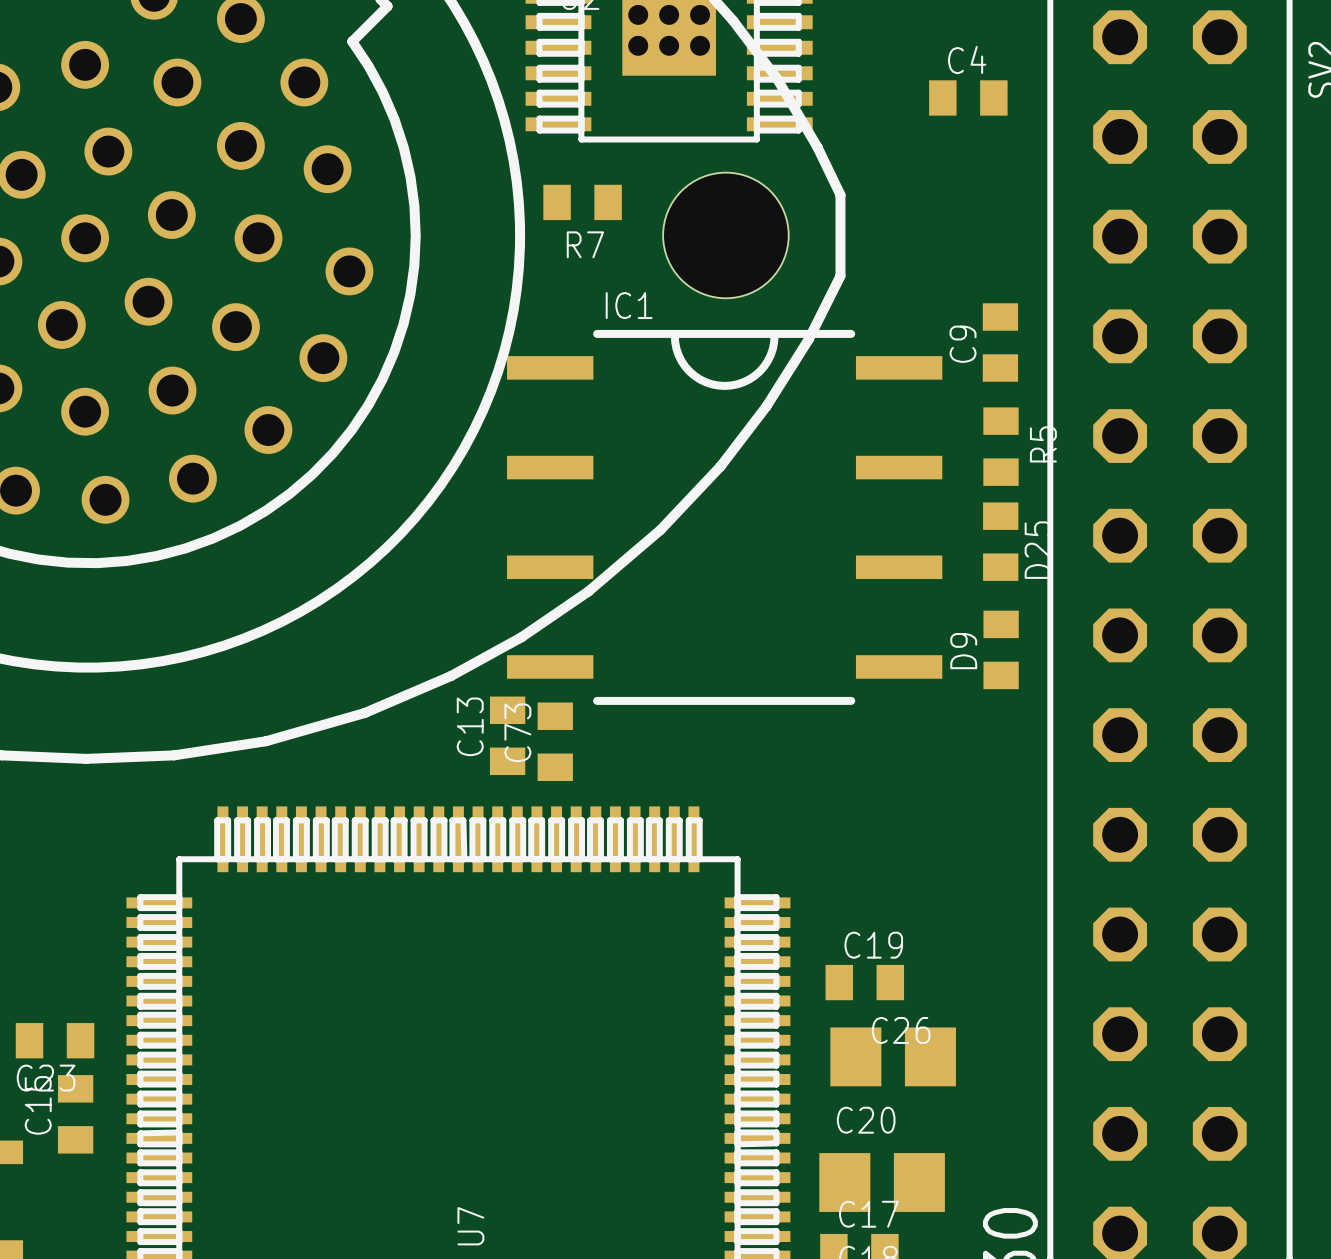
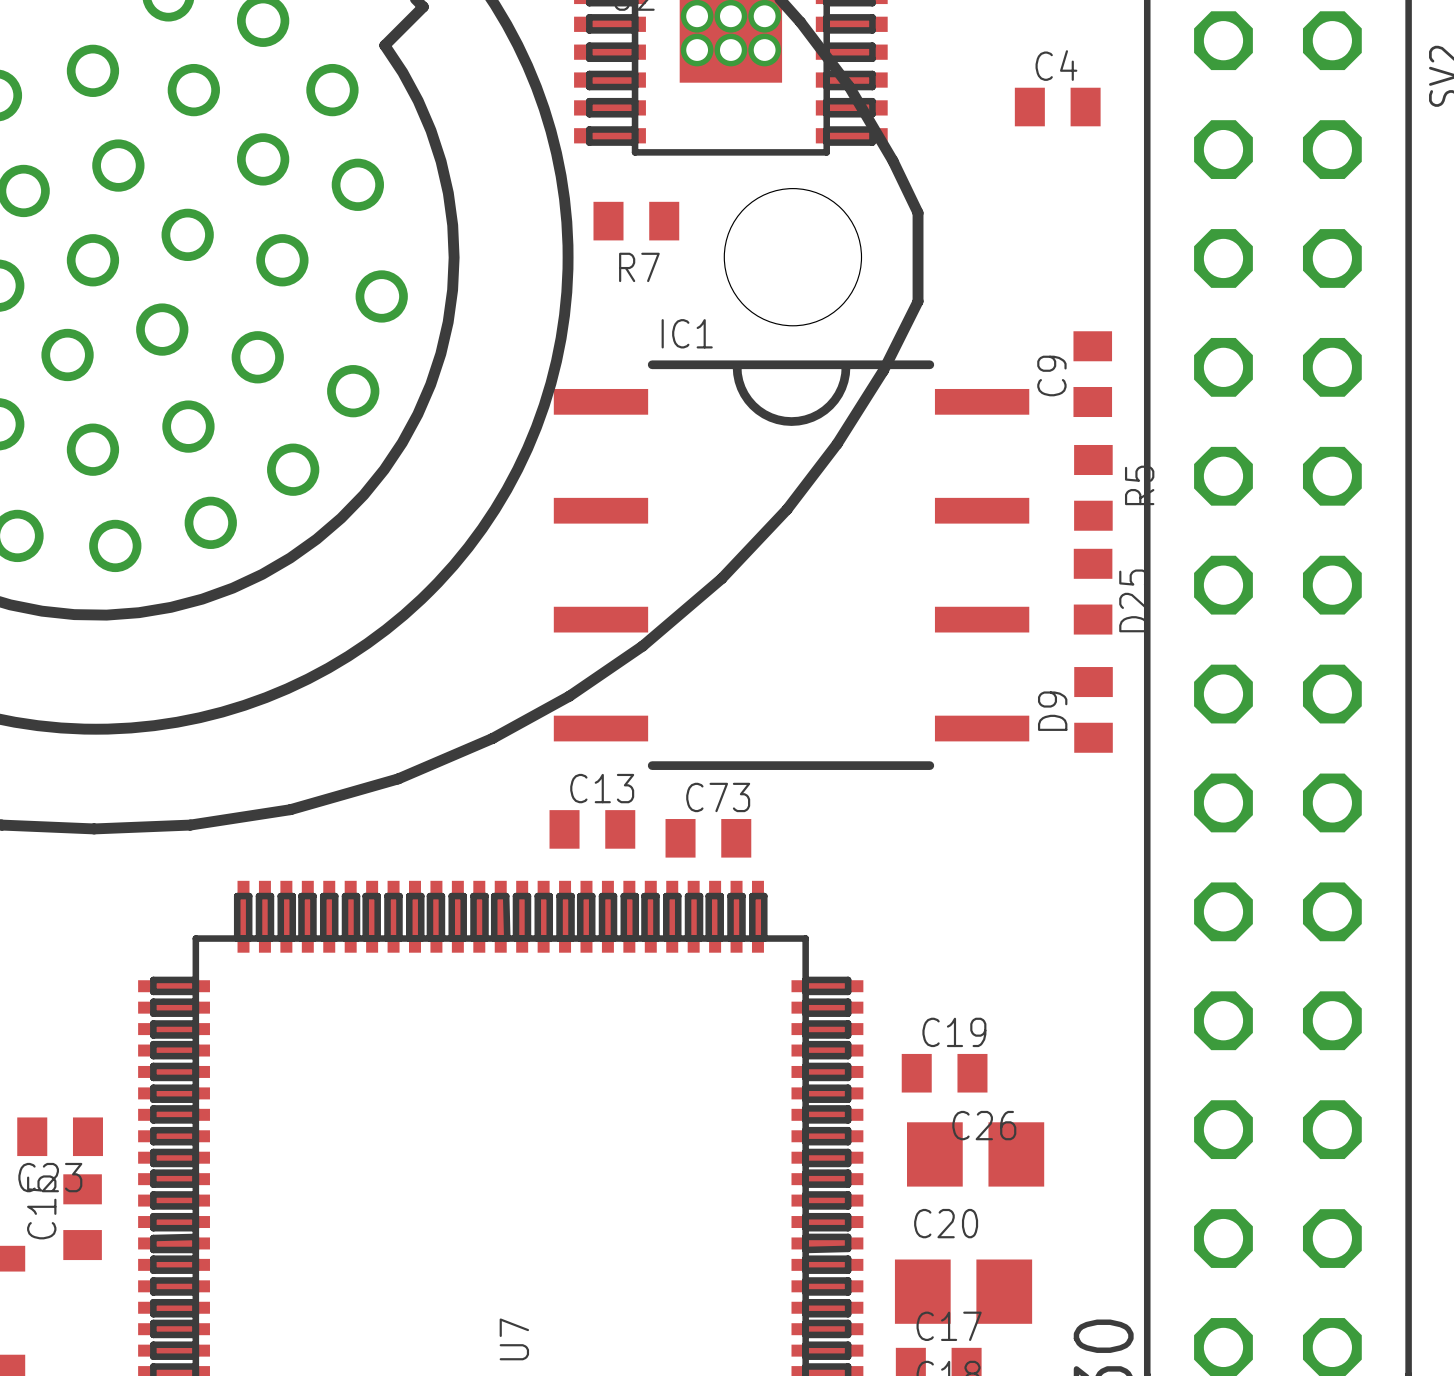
C13 rotation: 0° (507, 735) -> 90° clockwise (592, 829)
C73 rotation: 0° (555, 741) -> 90° clockwise (708, 838)
C73 position: (555, 741) -> (708, 838)

